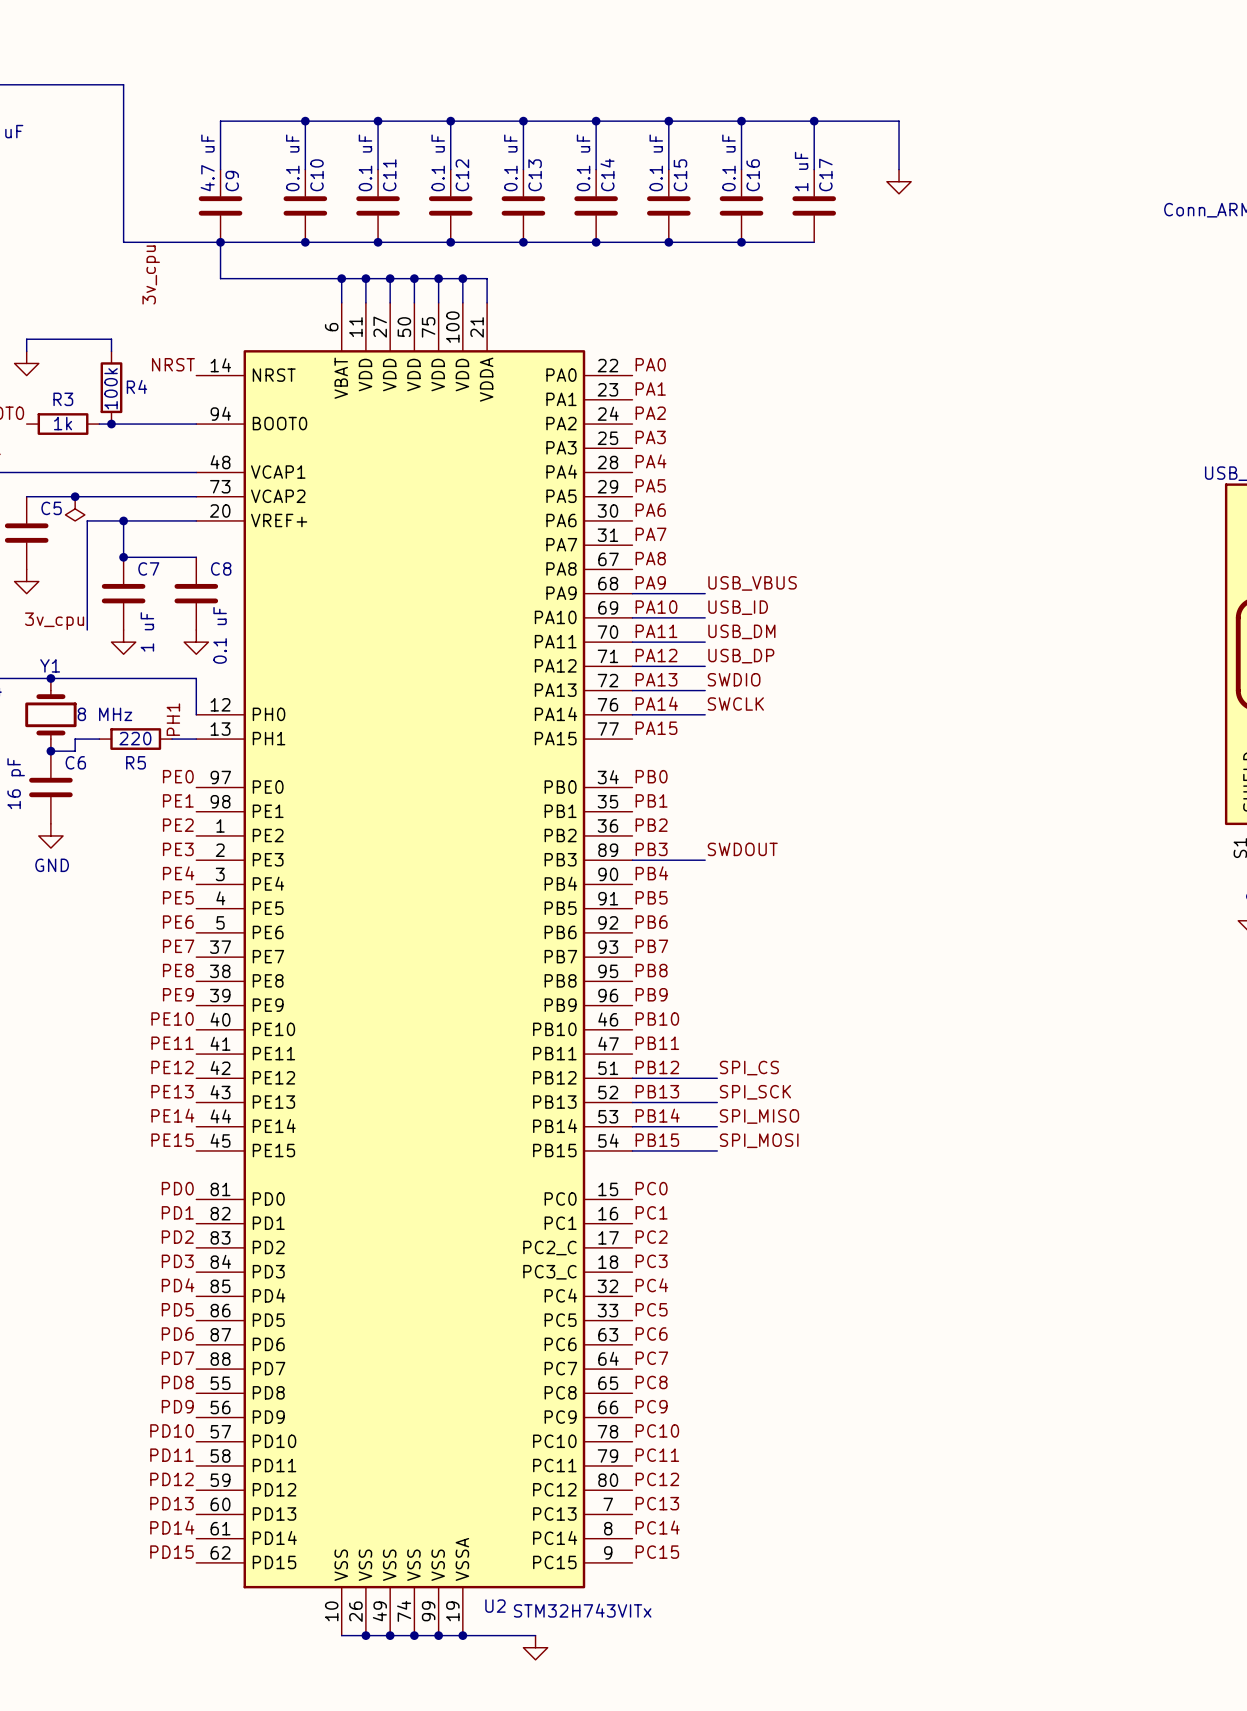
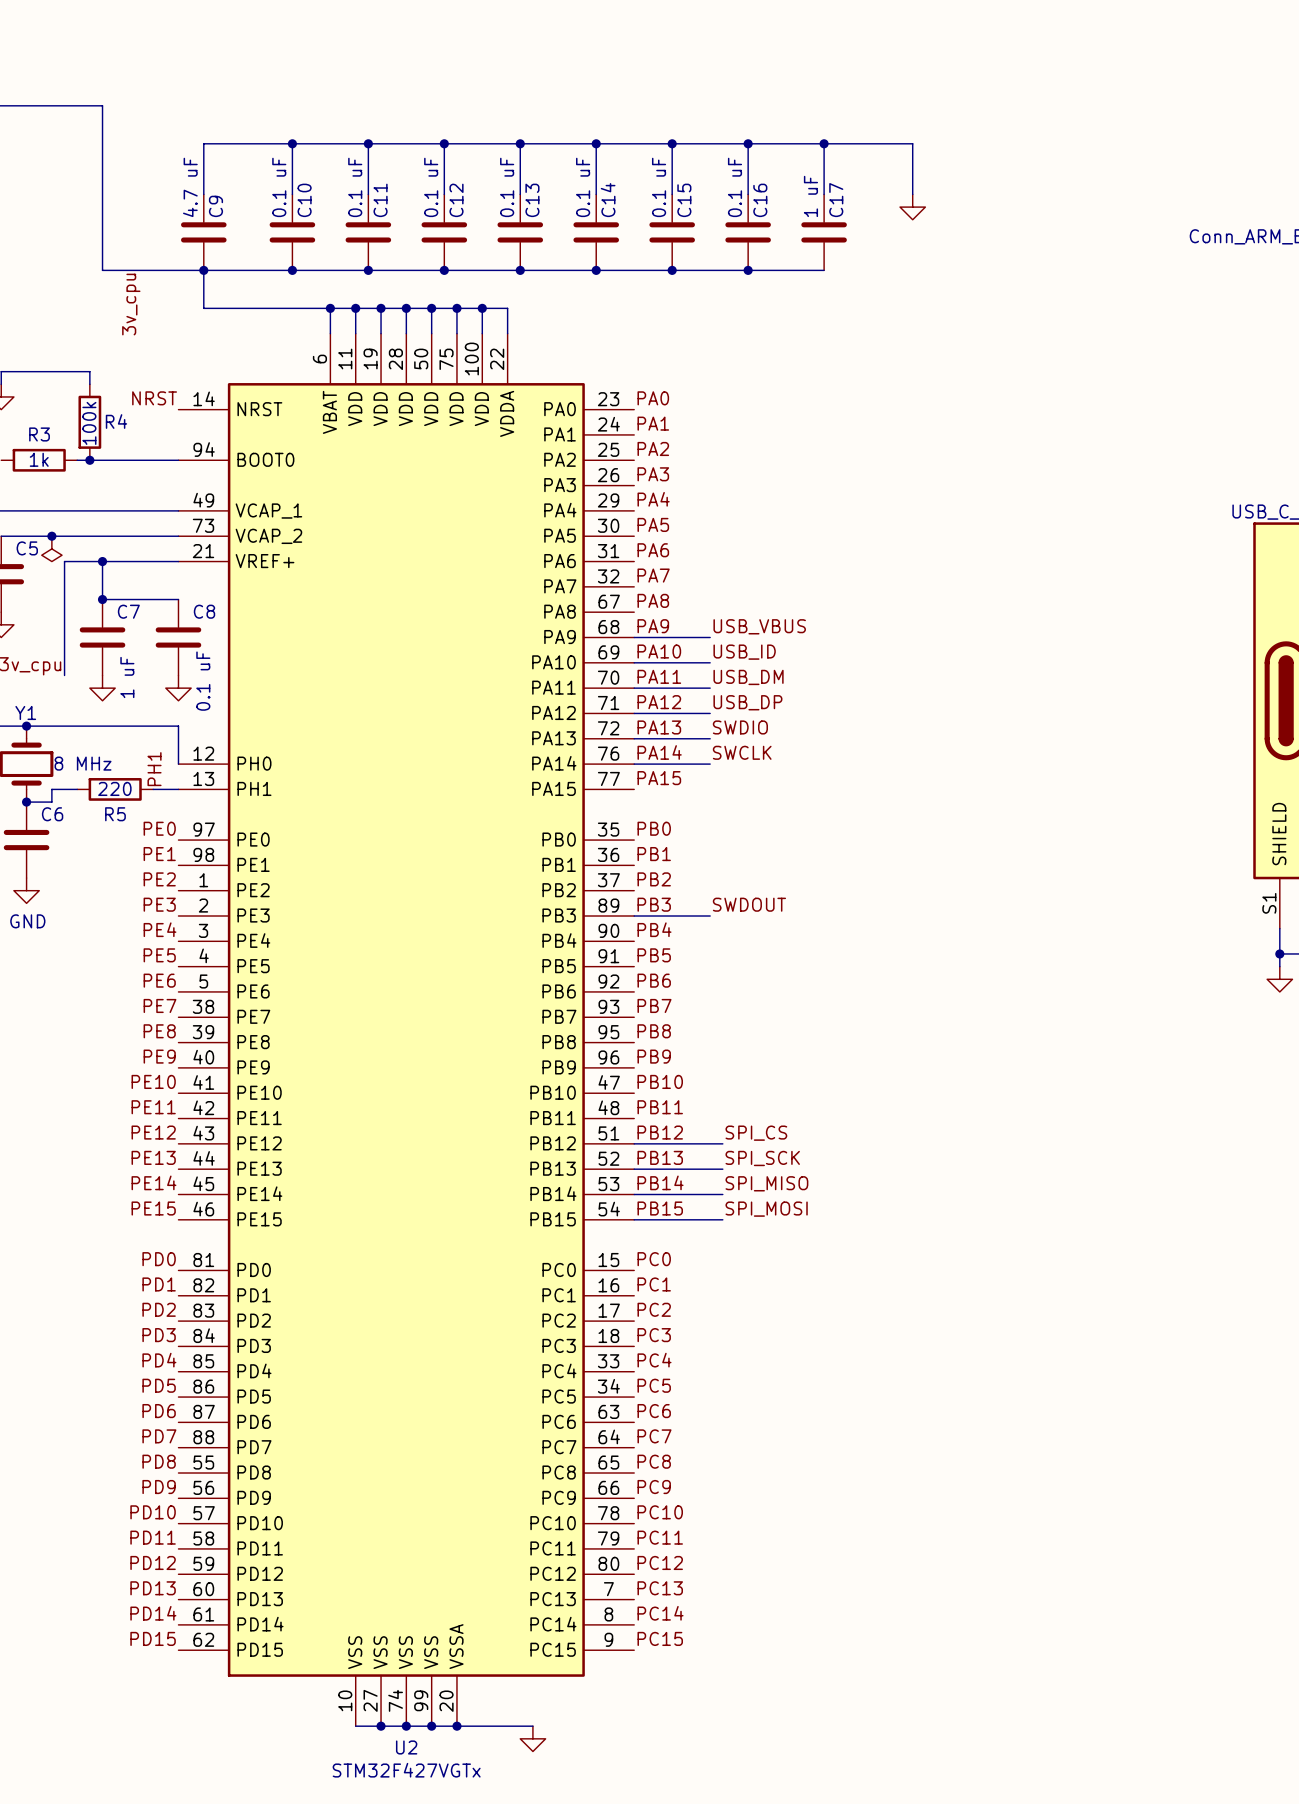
wire: none -> (482, 308) (507, 308) (507, 333)
junction: none -> (482, 308)
U2 symbol: [196, 302, 633, 1636] -> [178, 333, 635, 1727]
U2 name position: U2 (495, 1606) -> U2 (406, 1747)
U2 value: STM32H743VITx (582, 1610) -> STM32F427VGTx (406, 1770)
wire: (341, 1635) (365, 1635) -> none
junction: (365, 1635) -> none

